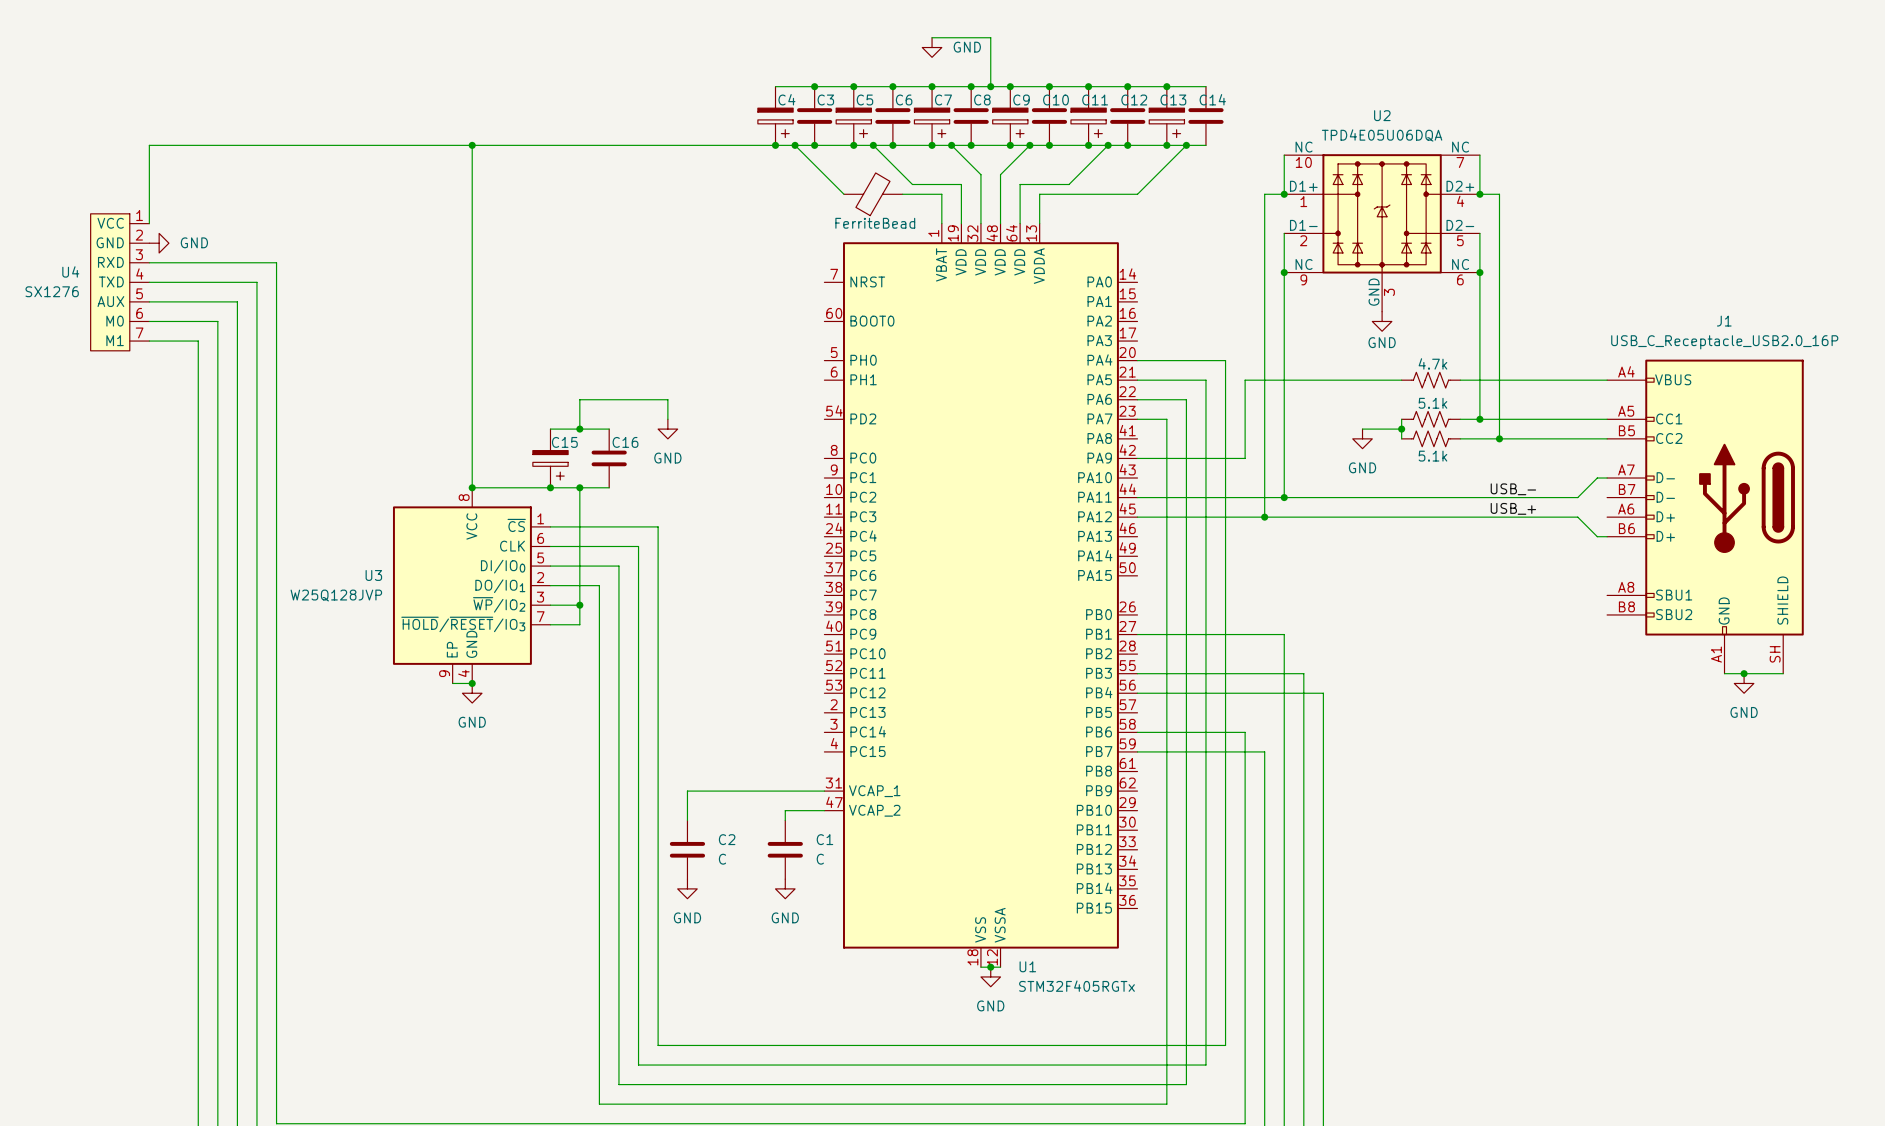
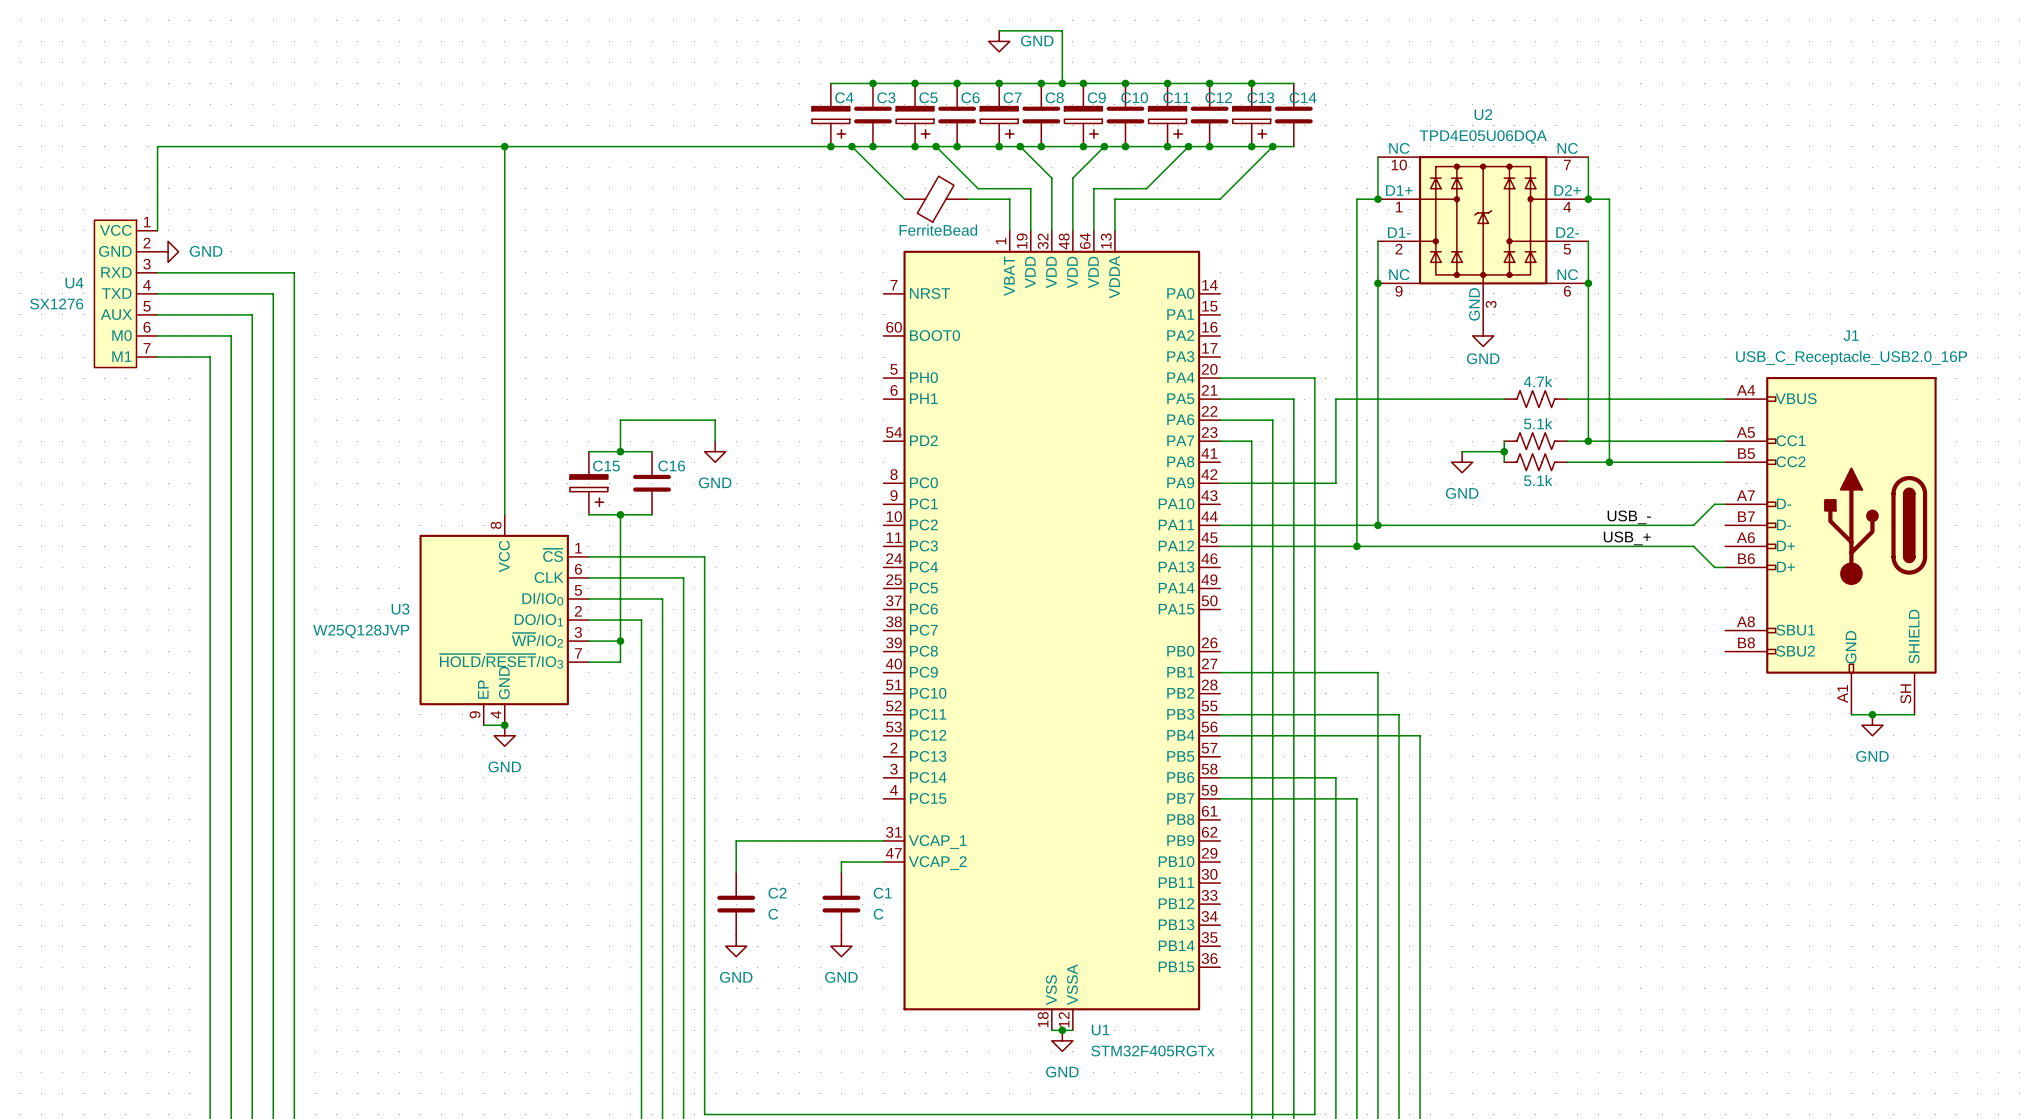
wire: (472, 487) (550, 487) -> none
junction: (472, 487) -> none
junction: (550, 487) -> none

